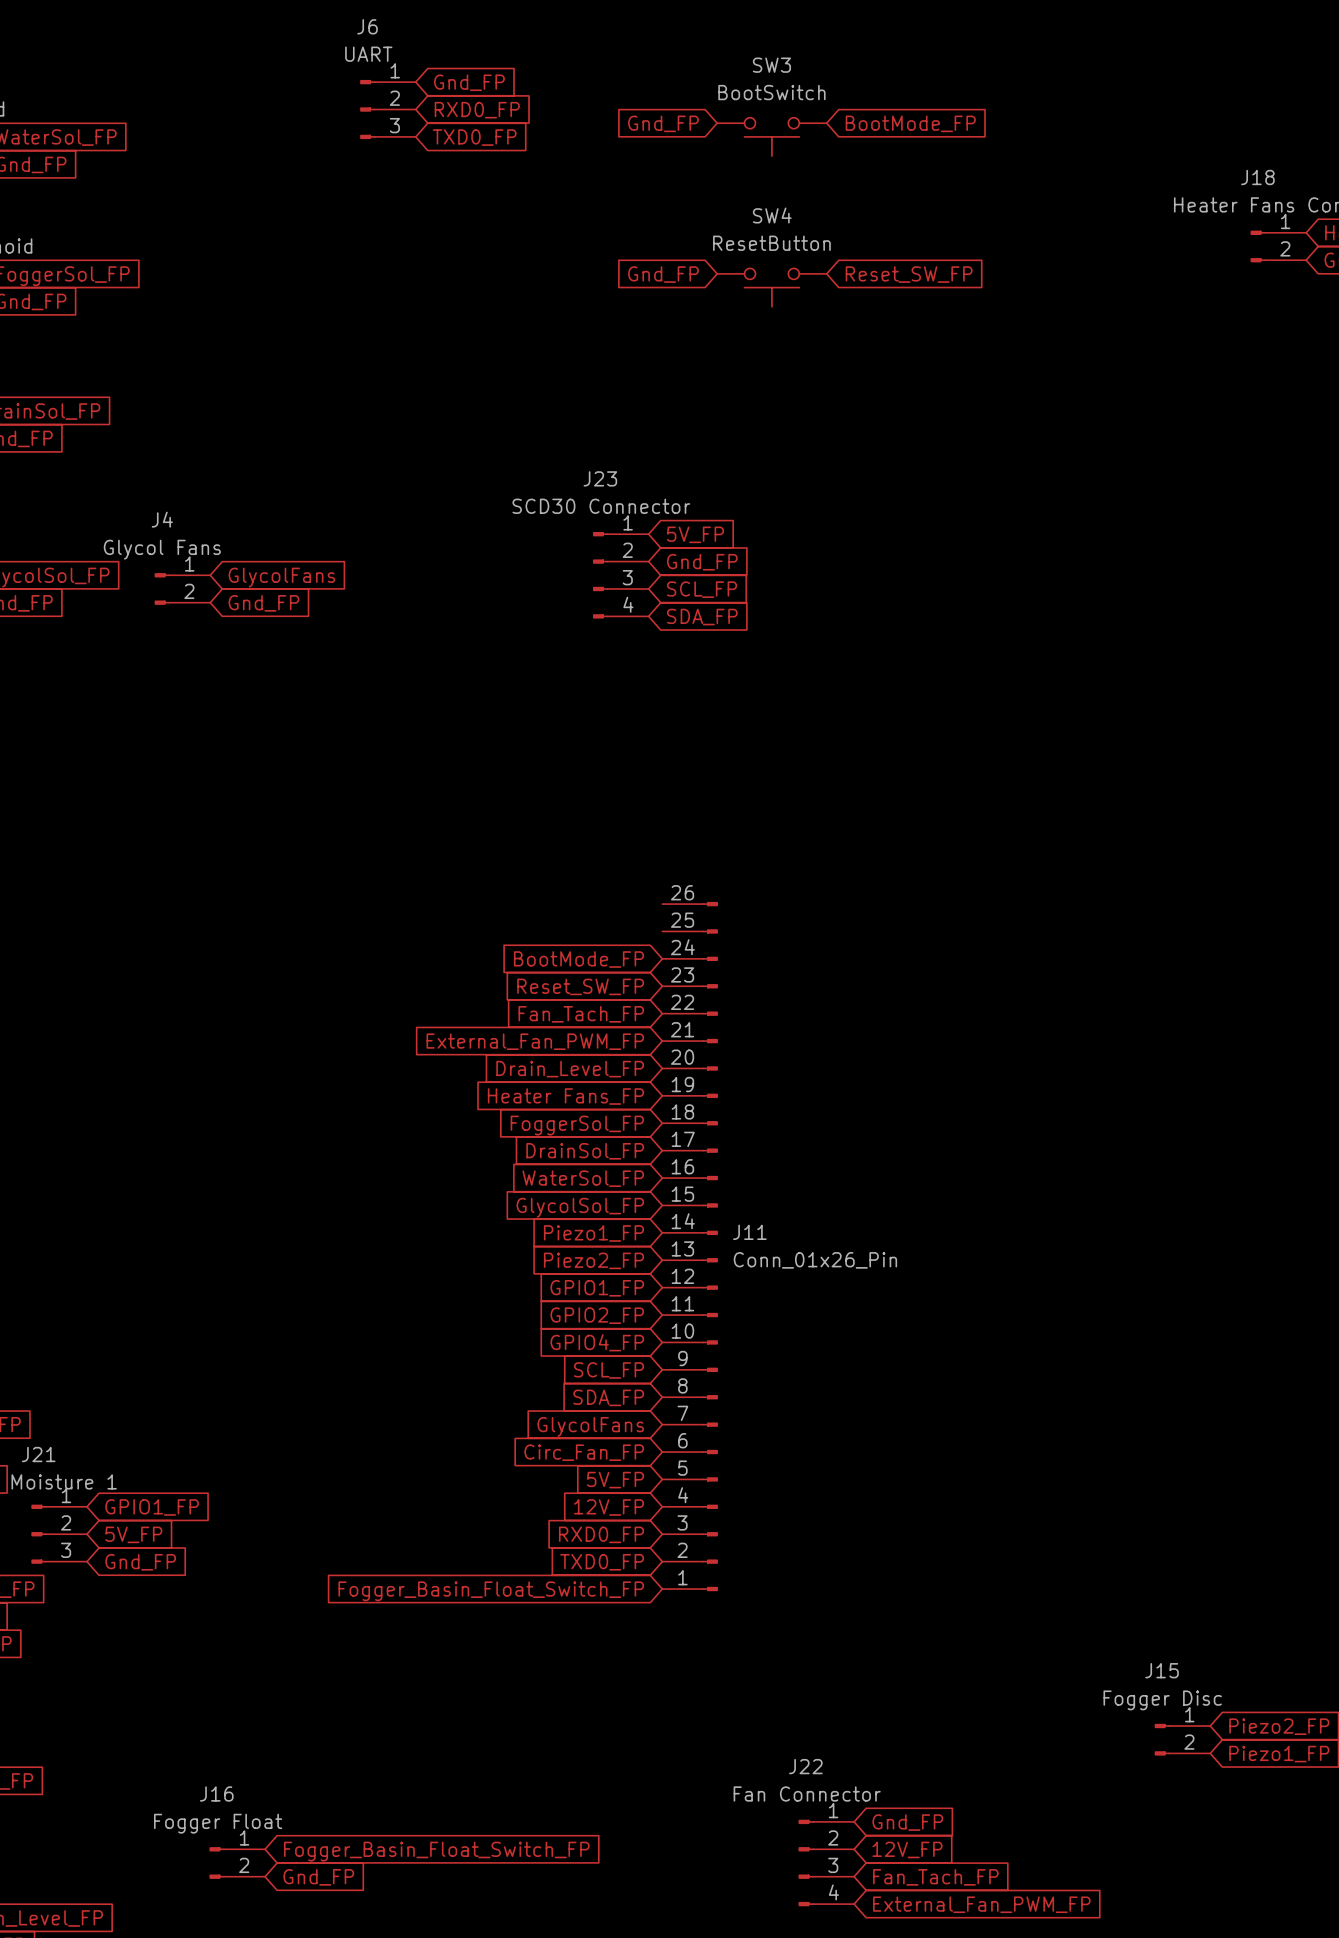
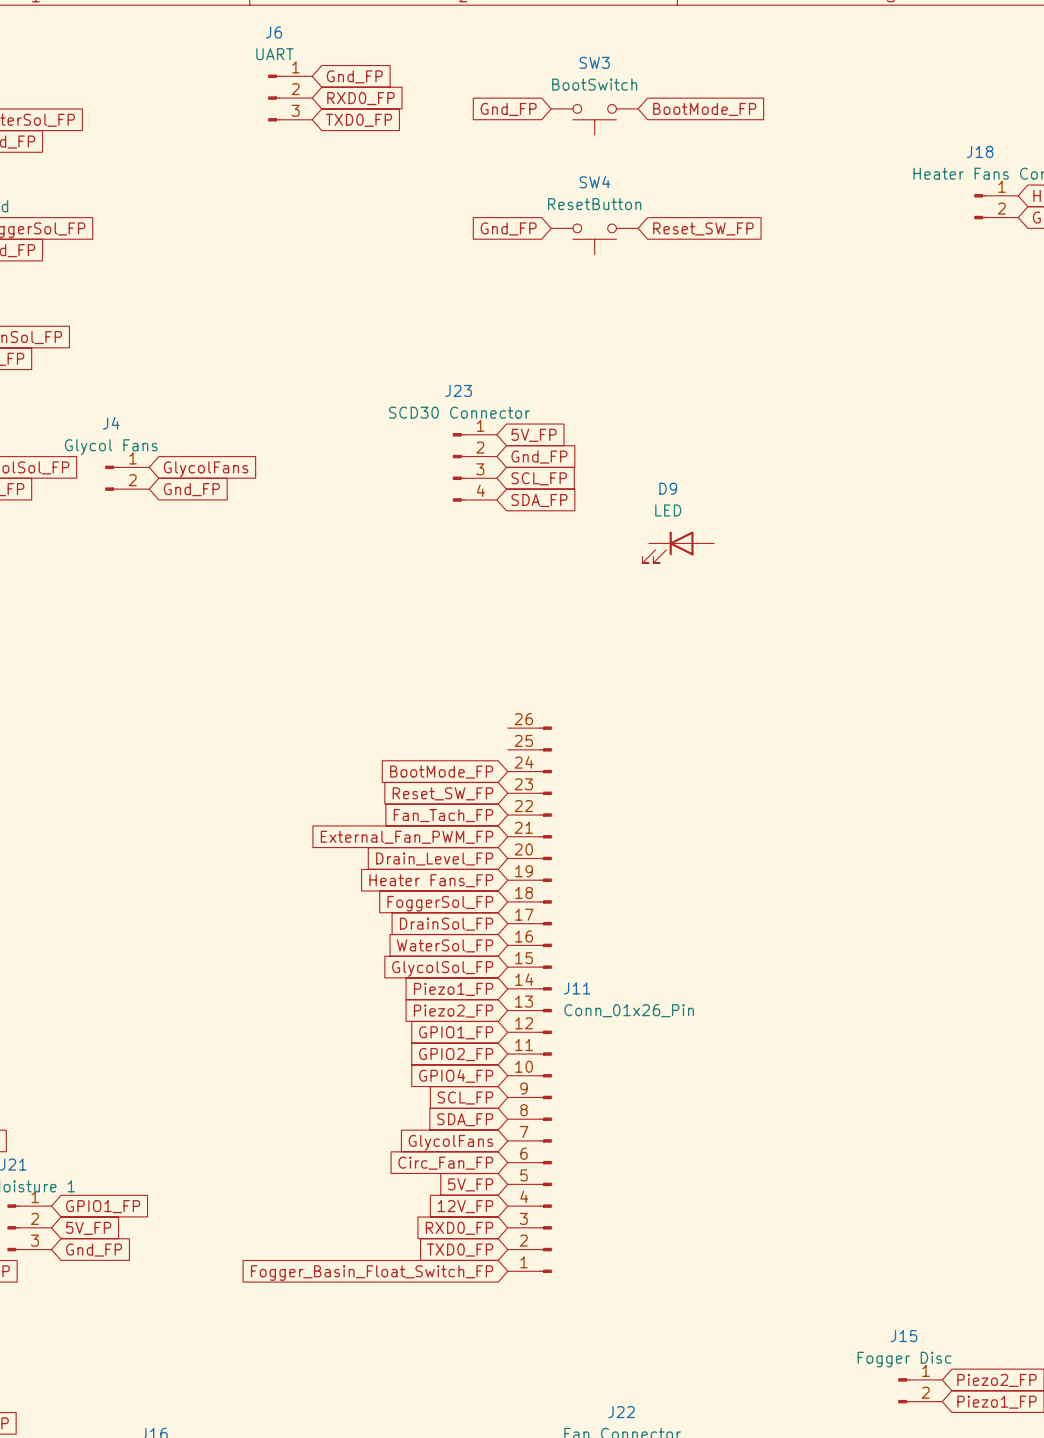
D9: none -> LED (678, 547)

